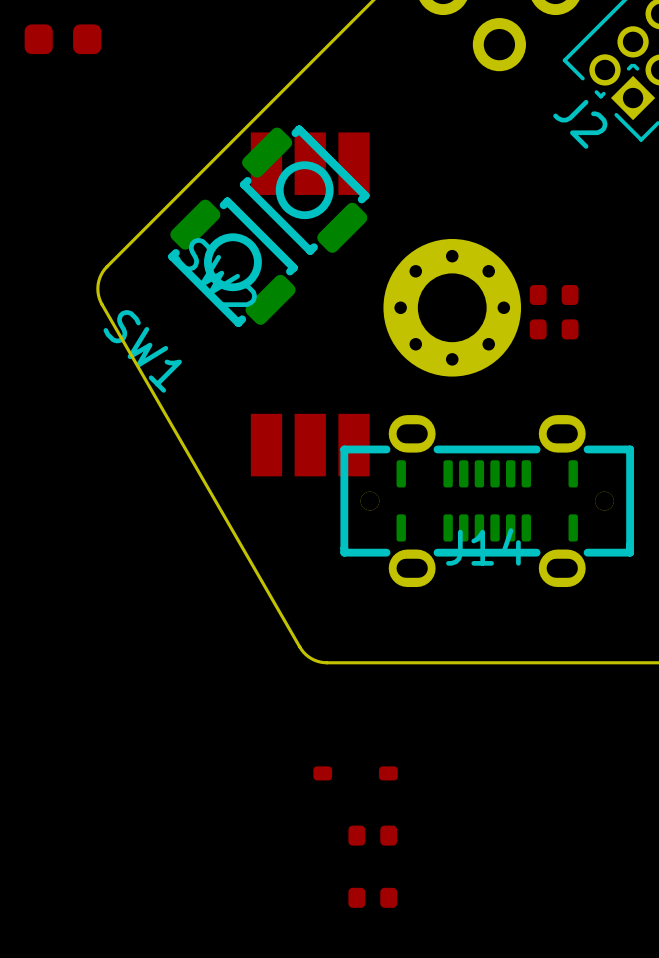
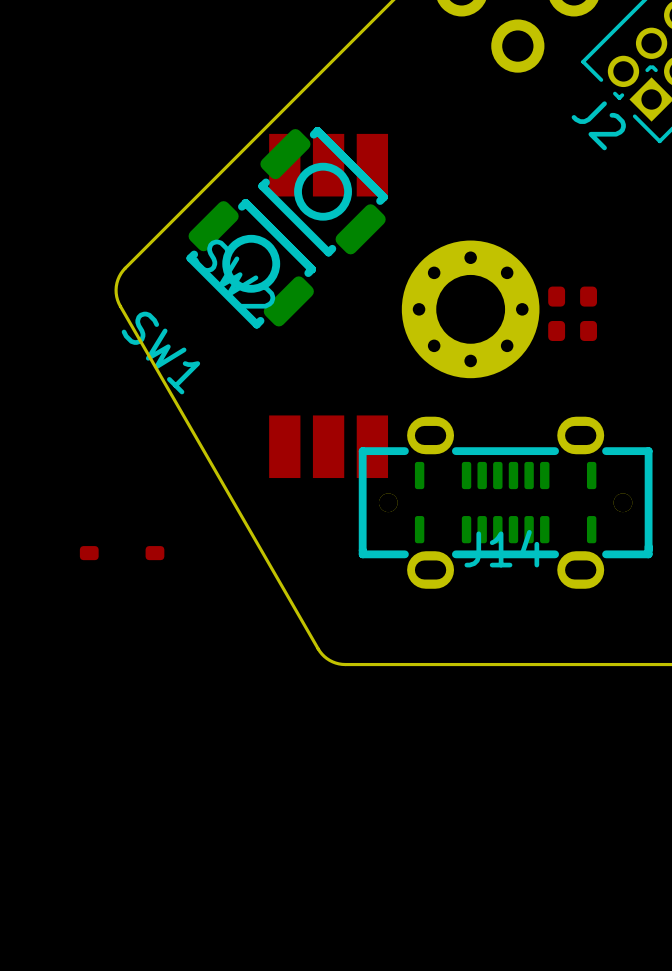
part: (62, 39) -> none
part position: (355, 773) -> (122, 553)
part: (372, 835) -> none
part: (372, 897) -> none

